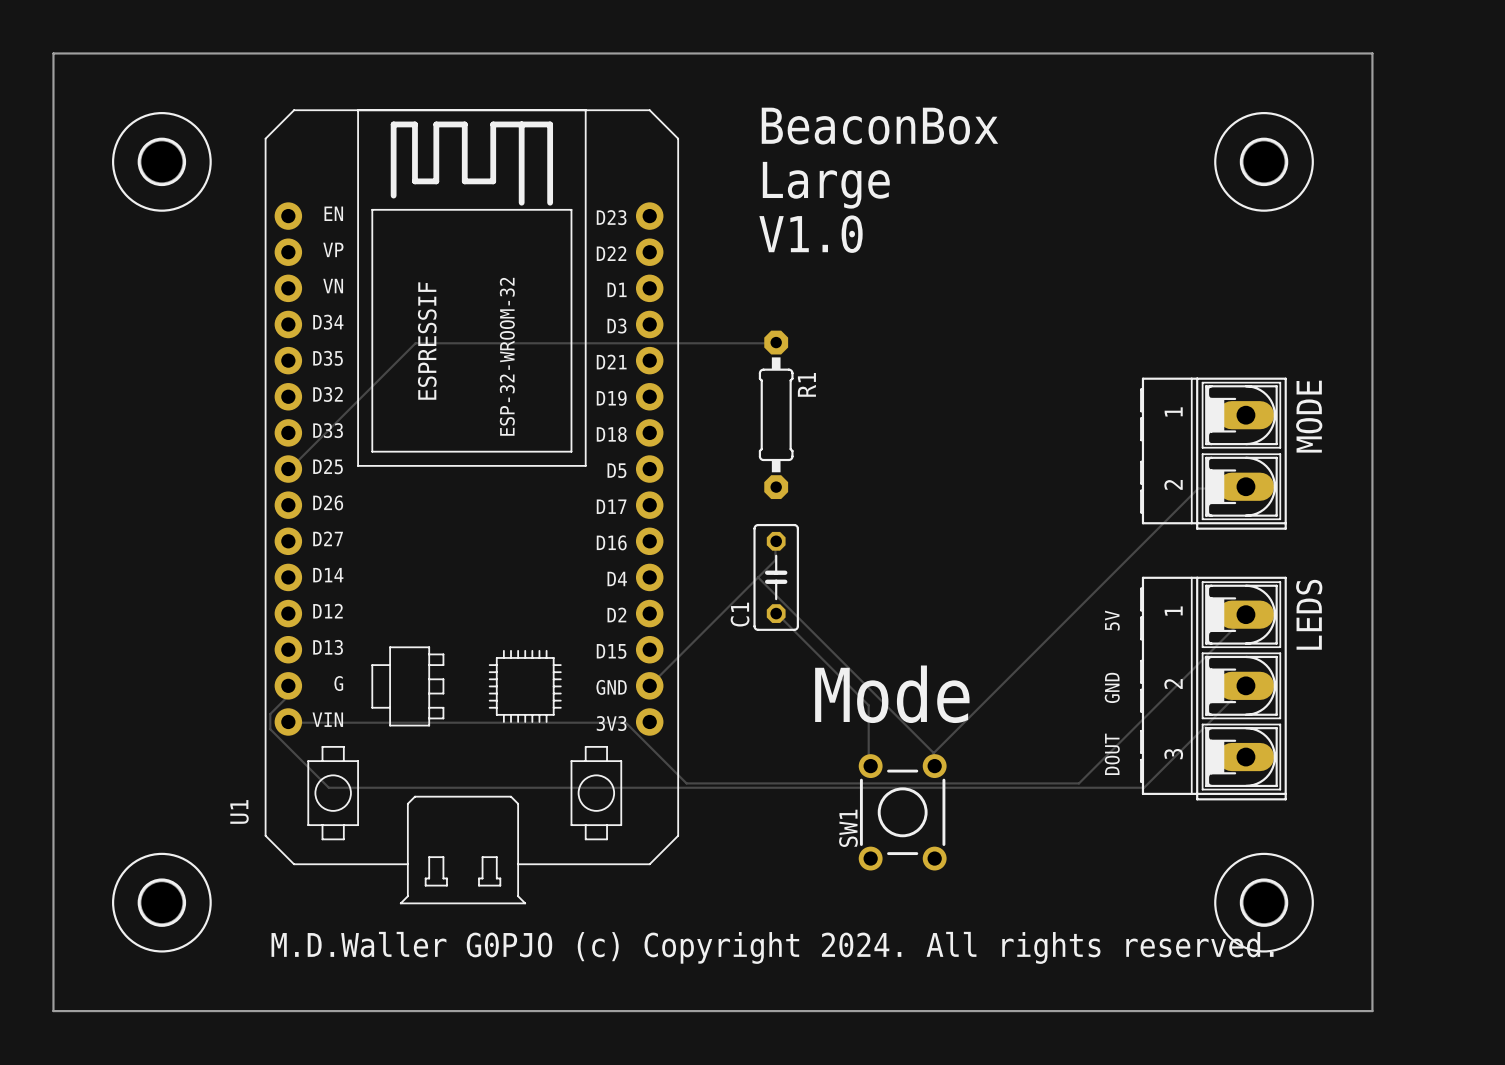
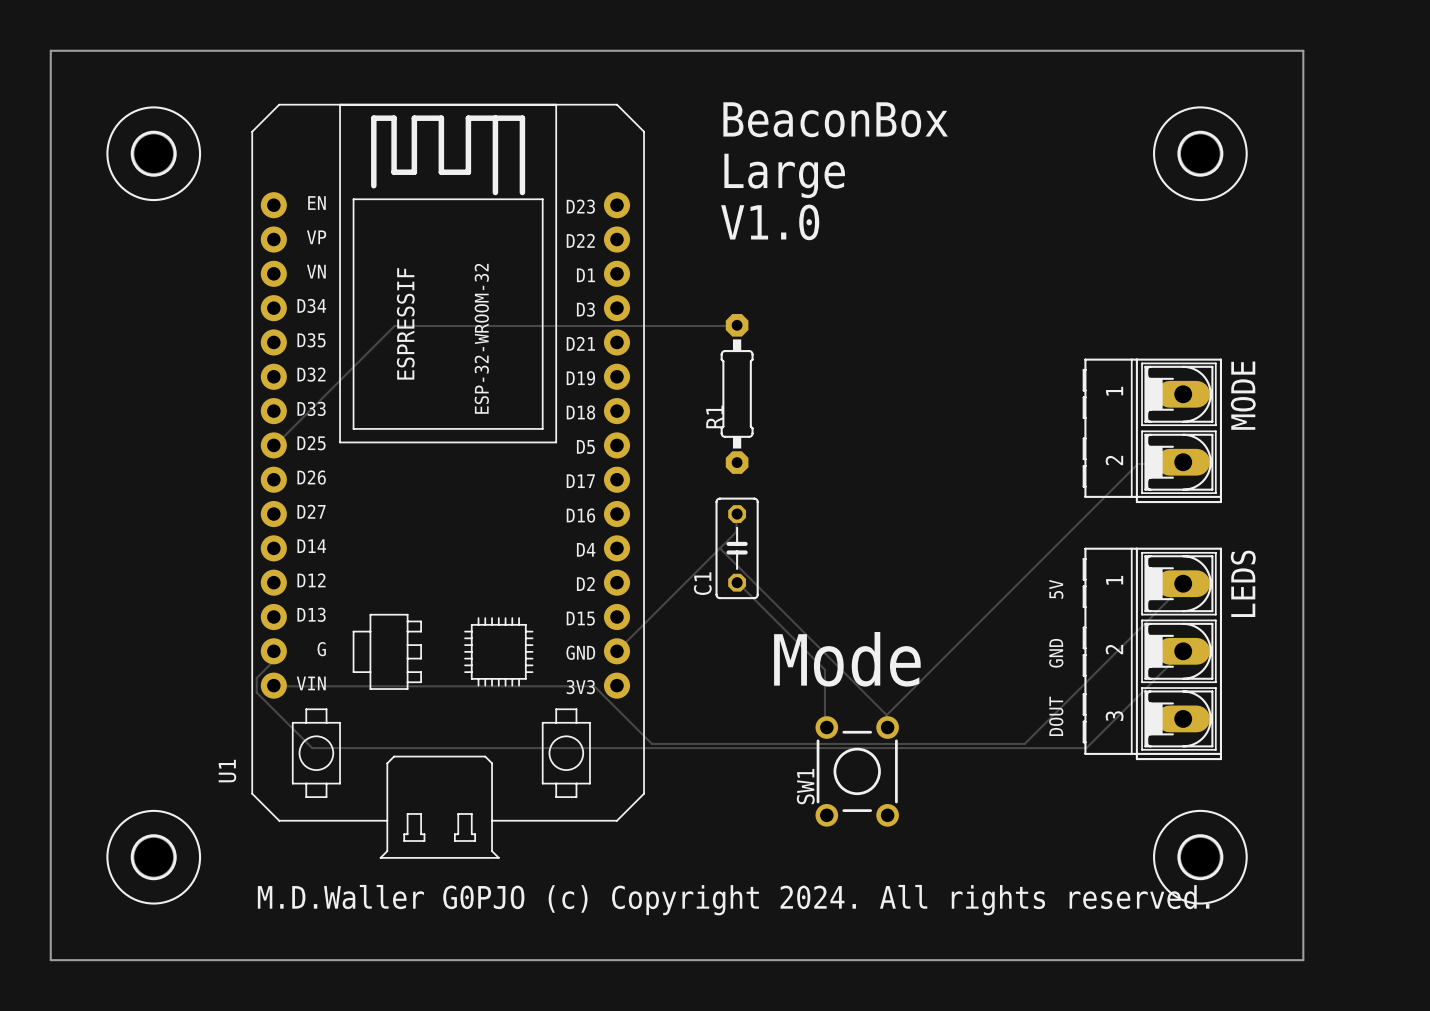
R1 name position: R1 (806, 384) -> R1 (714, 416)

